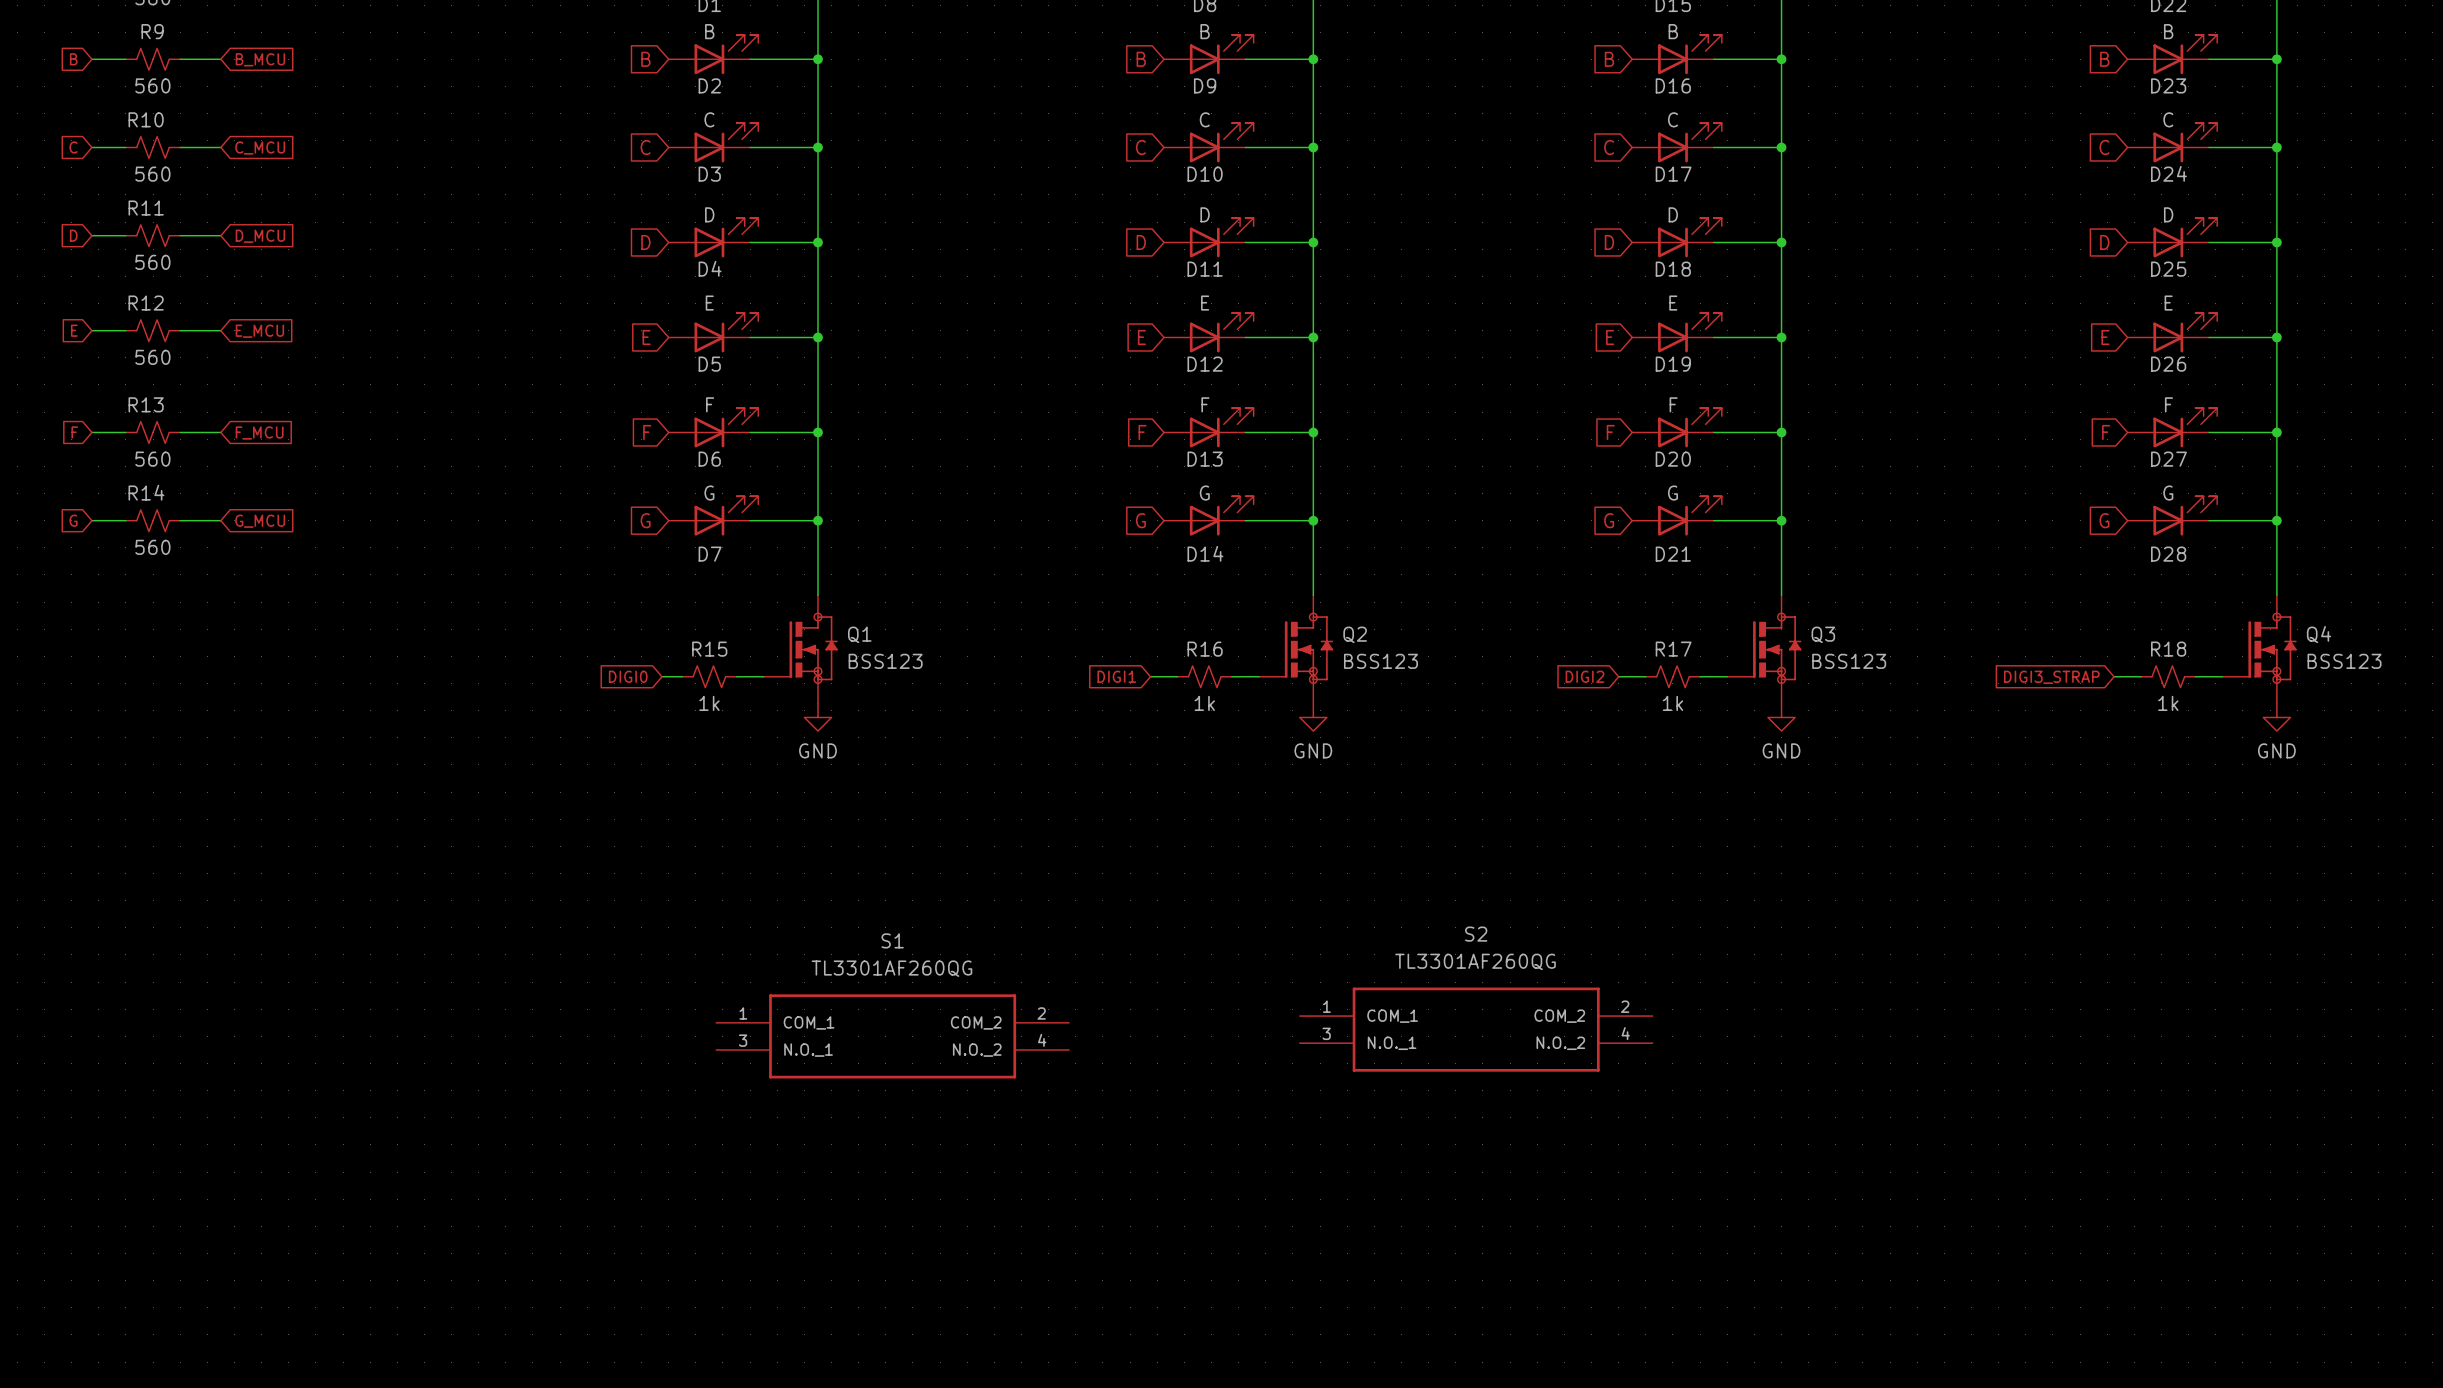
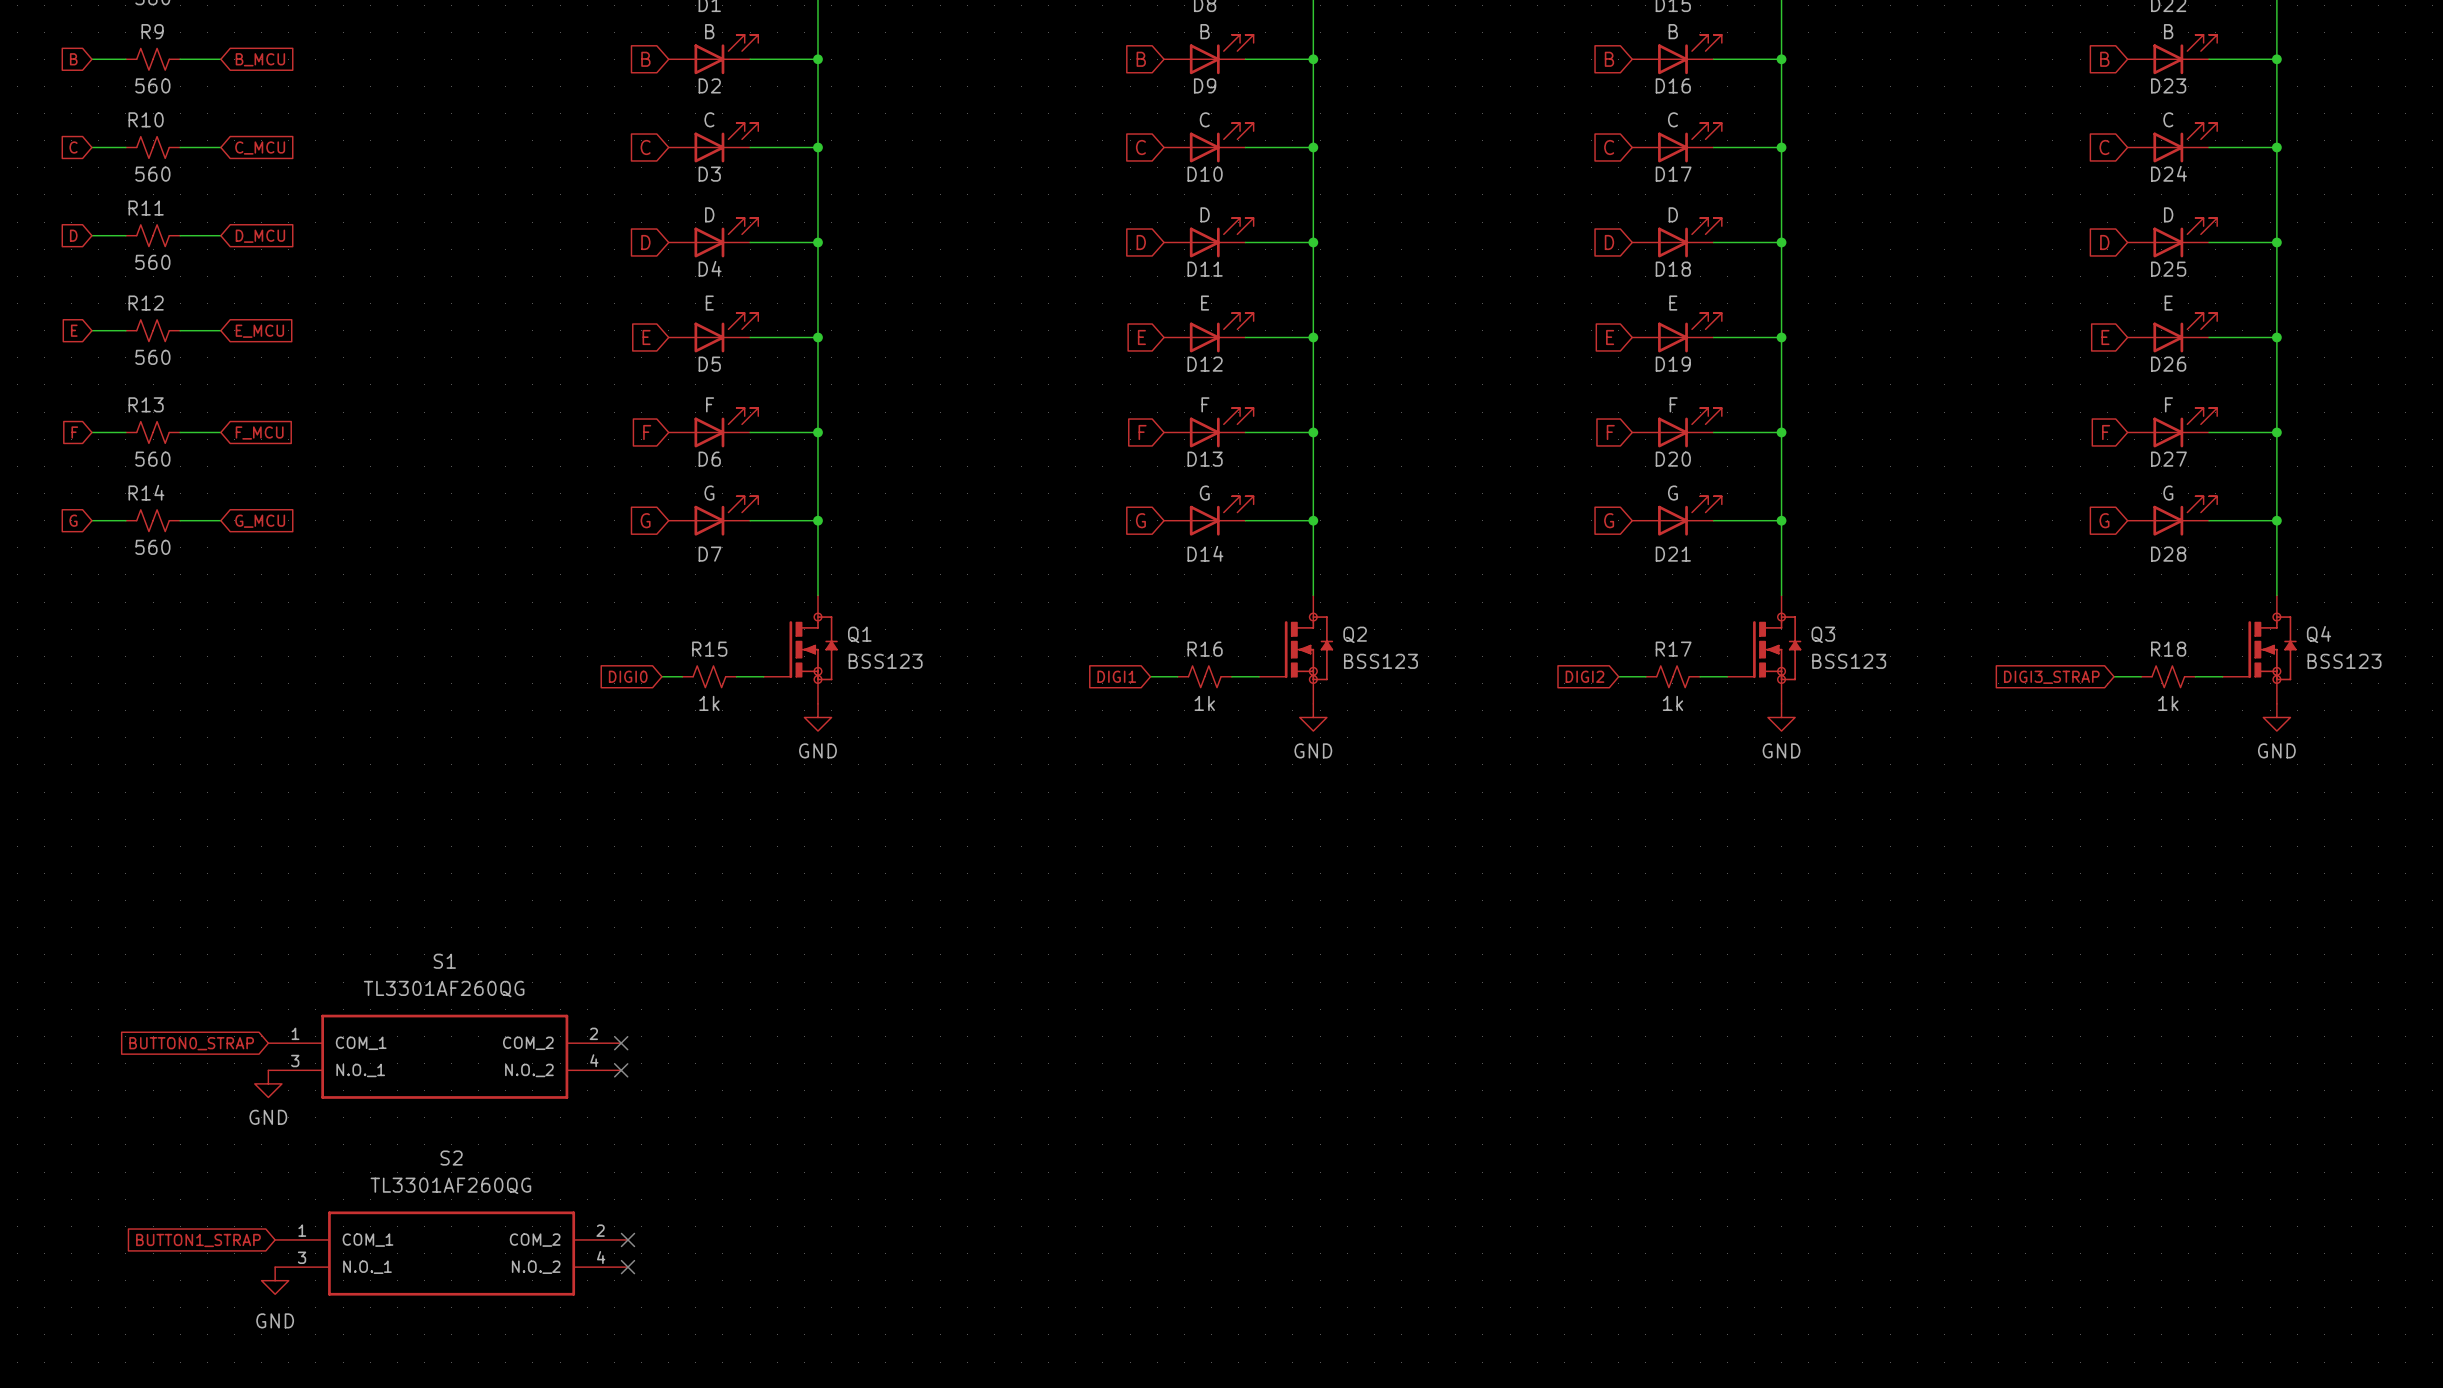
S2 position: (1476, 1029) -> (451, 1253)
S1 position: (892, 1036) -> (444, 1056)
global label: none -> BUTTON0_STRAP (191, 1043)
no-connect mark: none -> (621, 1043)
no-connect mark: none -> (621, 1070)
power symbol: none -> GND (268, 1083)
no-connect mark: none -> (627, 1239)
global label: none -> BUTTON1_STRAP (198, 1240)
no-connect mark: none -> (627, 1267)
power symbol: none -> GND (275, 1280)

